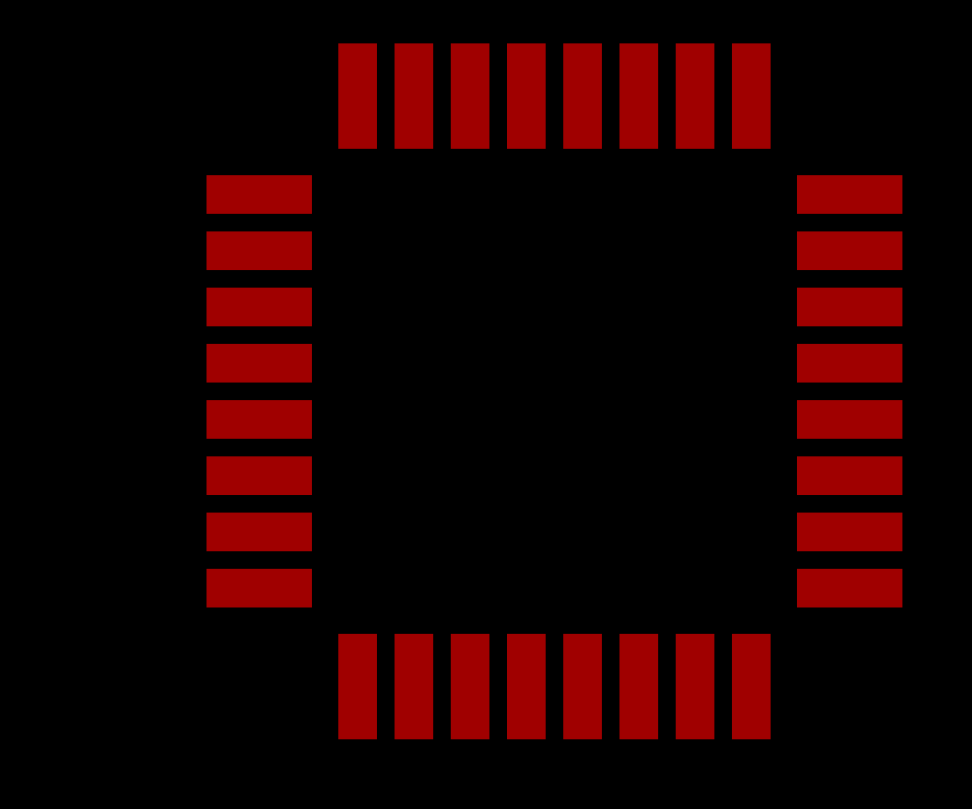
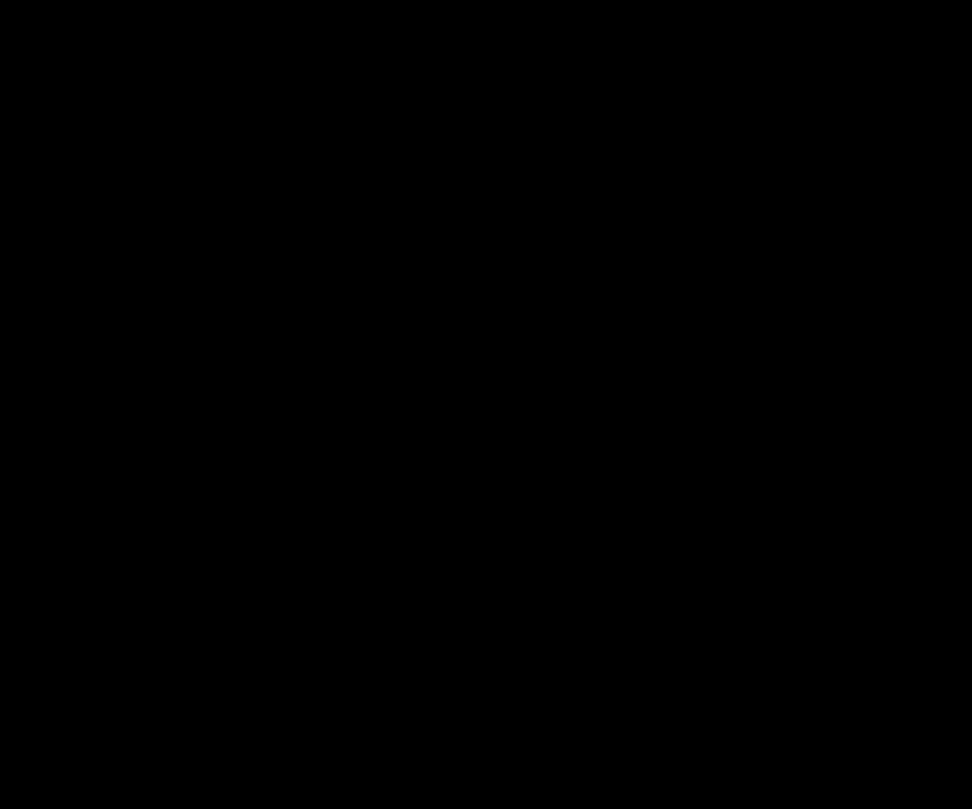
part: (554, 391) -> none

